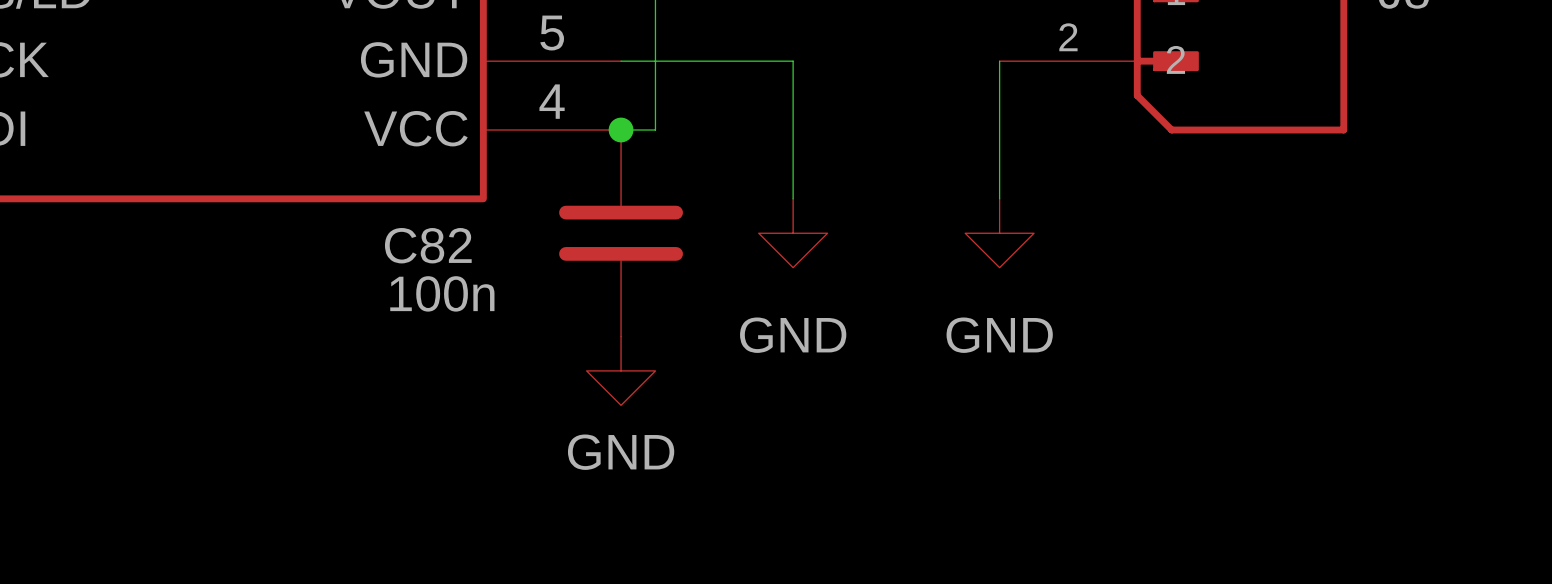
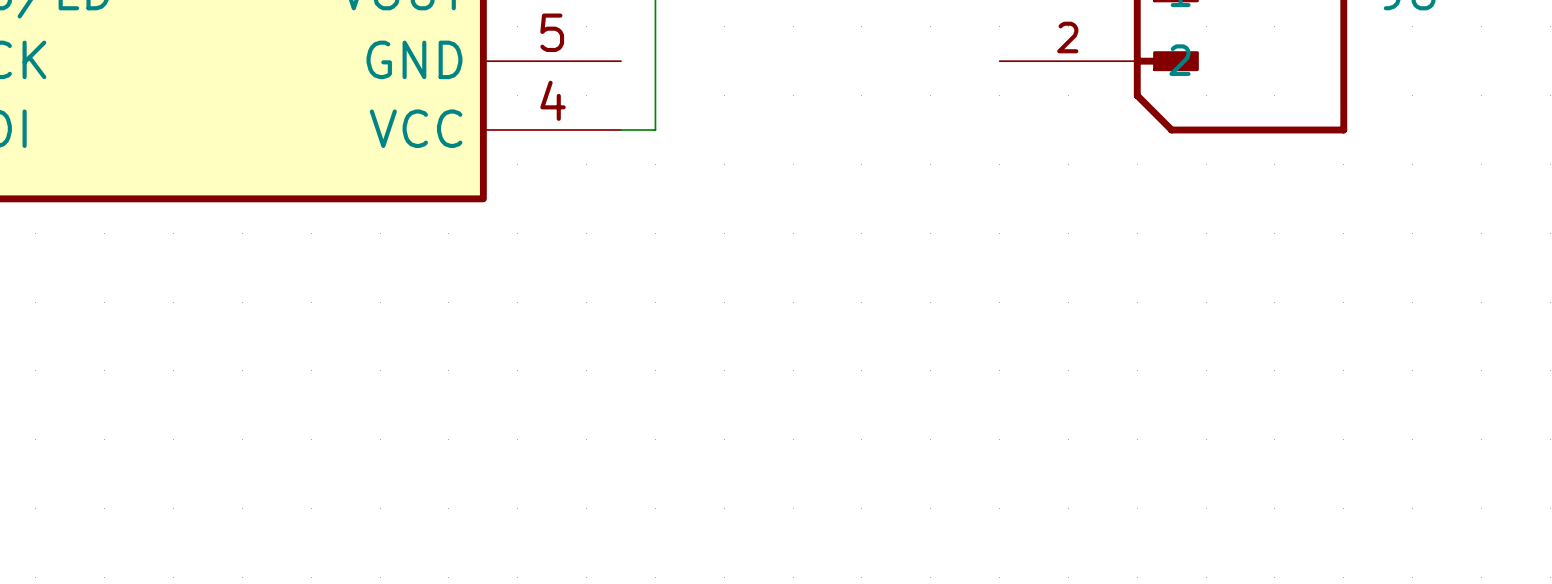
wire: (621, 61) (793, 61) (793, 198) -> none
wire: (999, 61) (999, 198) -> none
junction: (621, 130) -> none
C82: 100n (621, 233) -> none
power symbol: GND (793, 233) -> none
power symbol: GND (999, 233) -> none
power symbol: GND (621, 370) -> none

